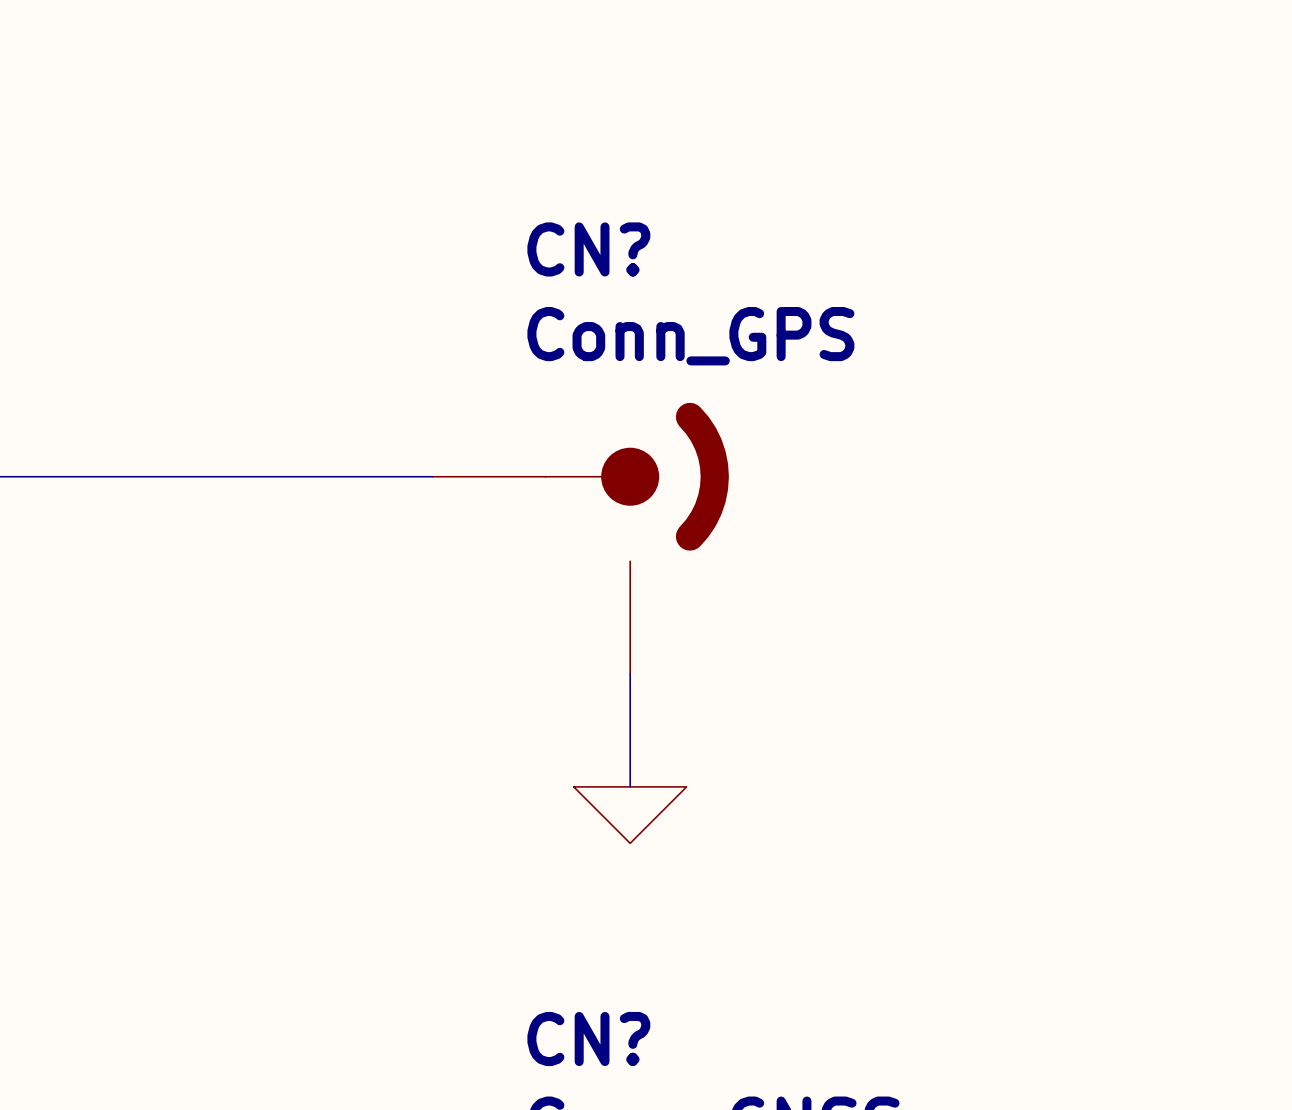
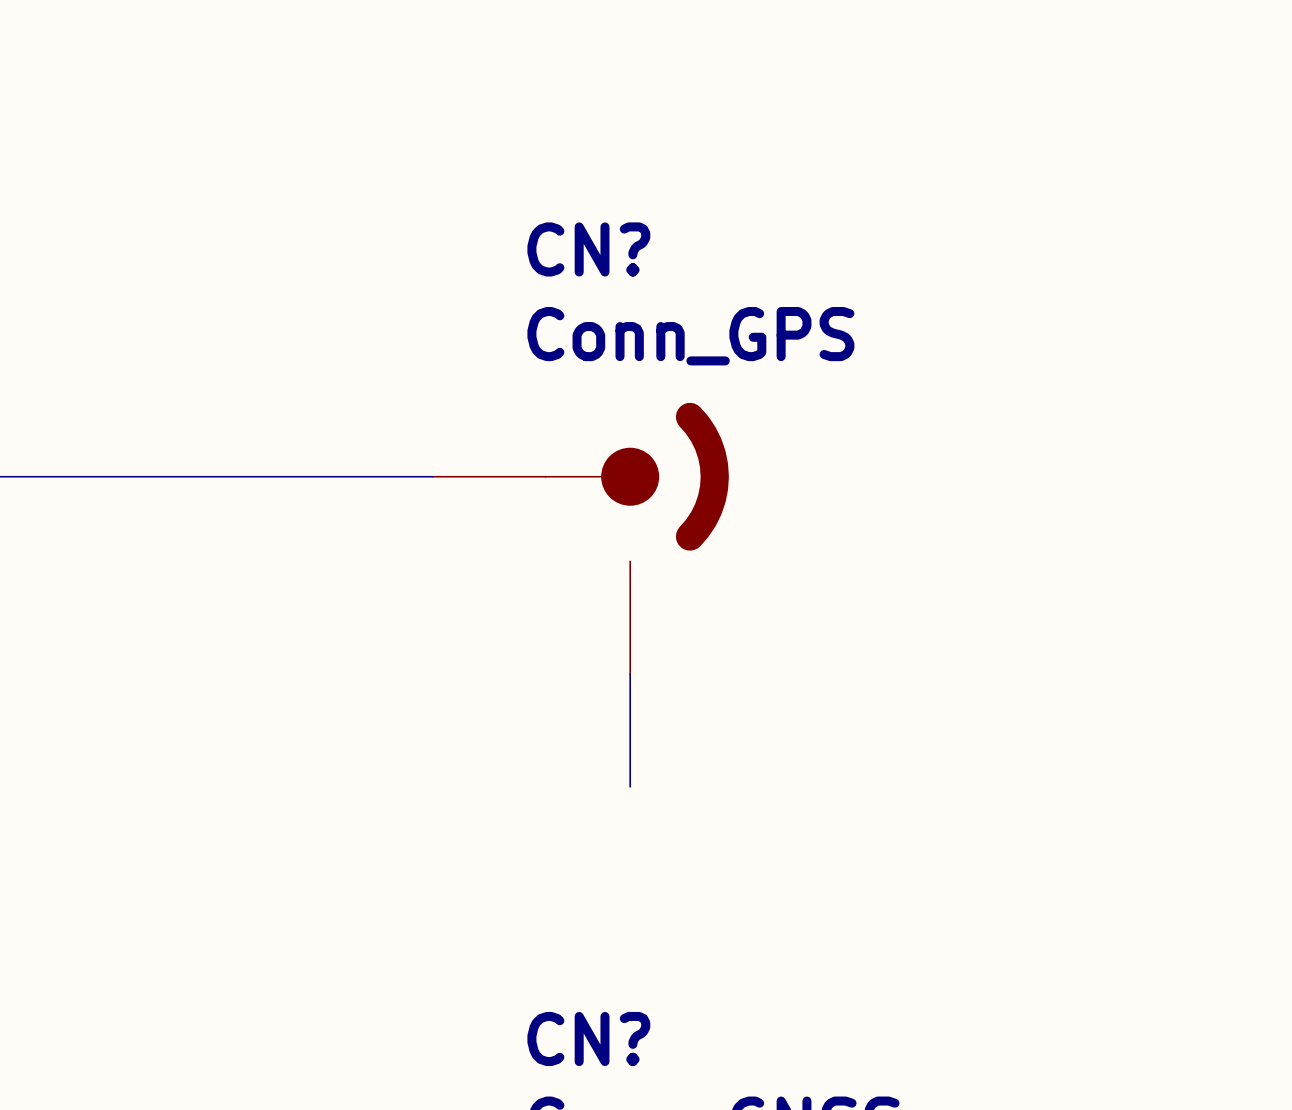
power symbol: (630, 815) -> none

